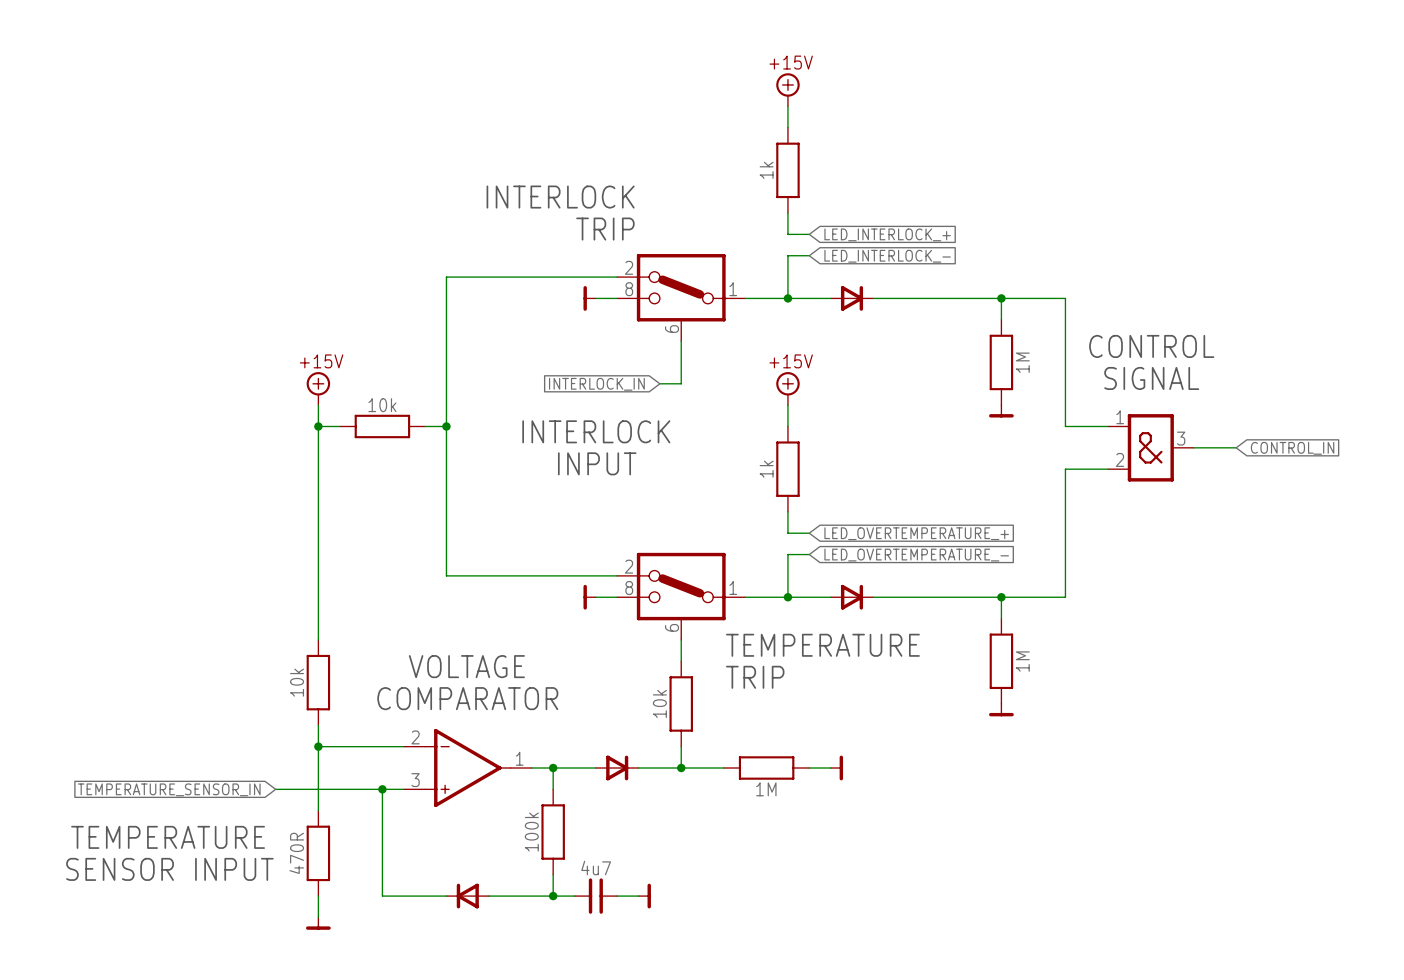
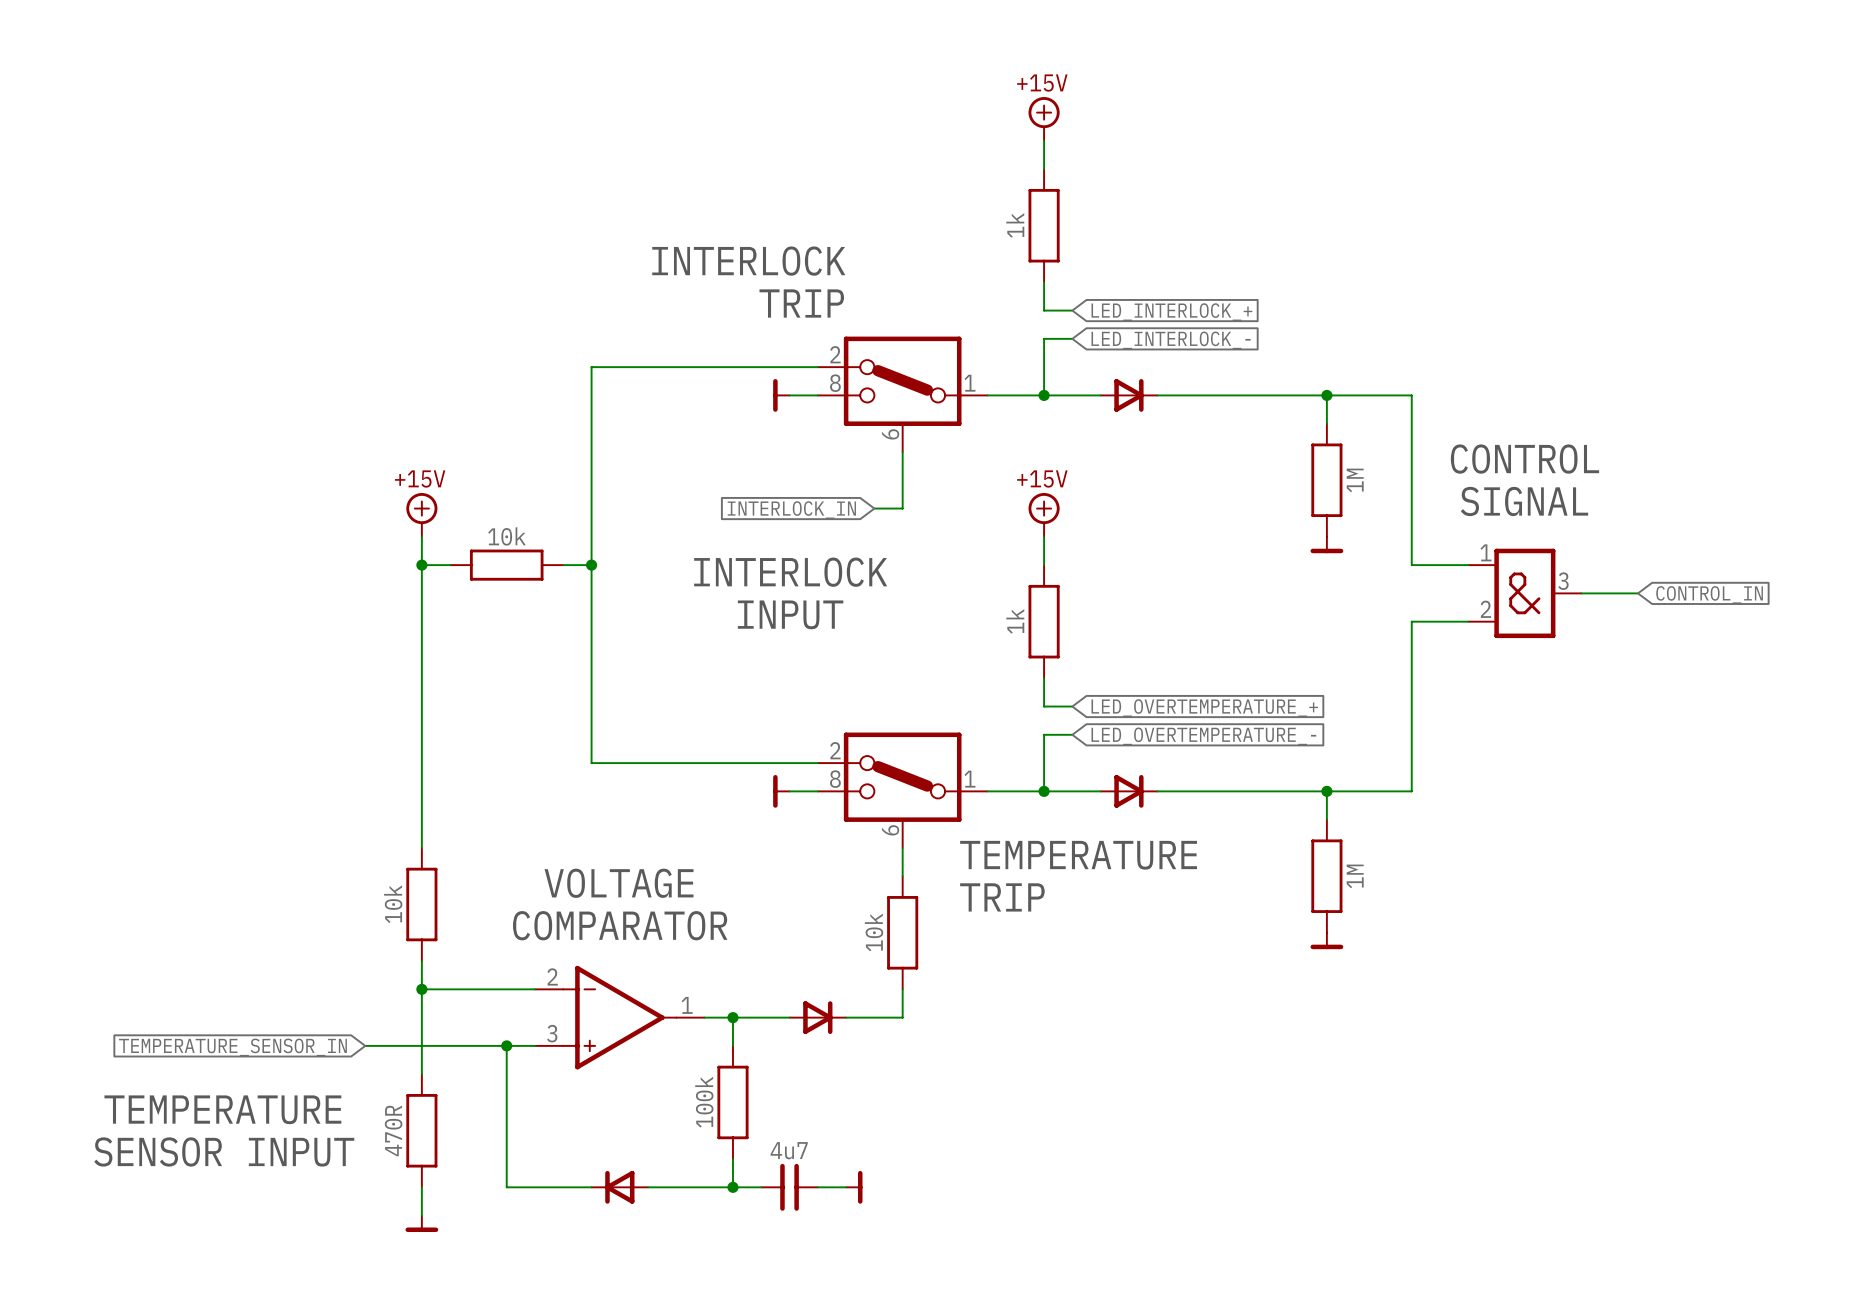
wire: (681, 768) (723, 768) -> none
junction: (681, 768) -> none
part: 1M (766, 768) -> none
wire: (809, 768) (830, 768) -> none
power symbol: (836, 768) -> none

